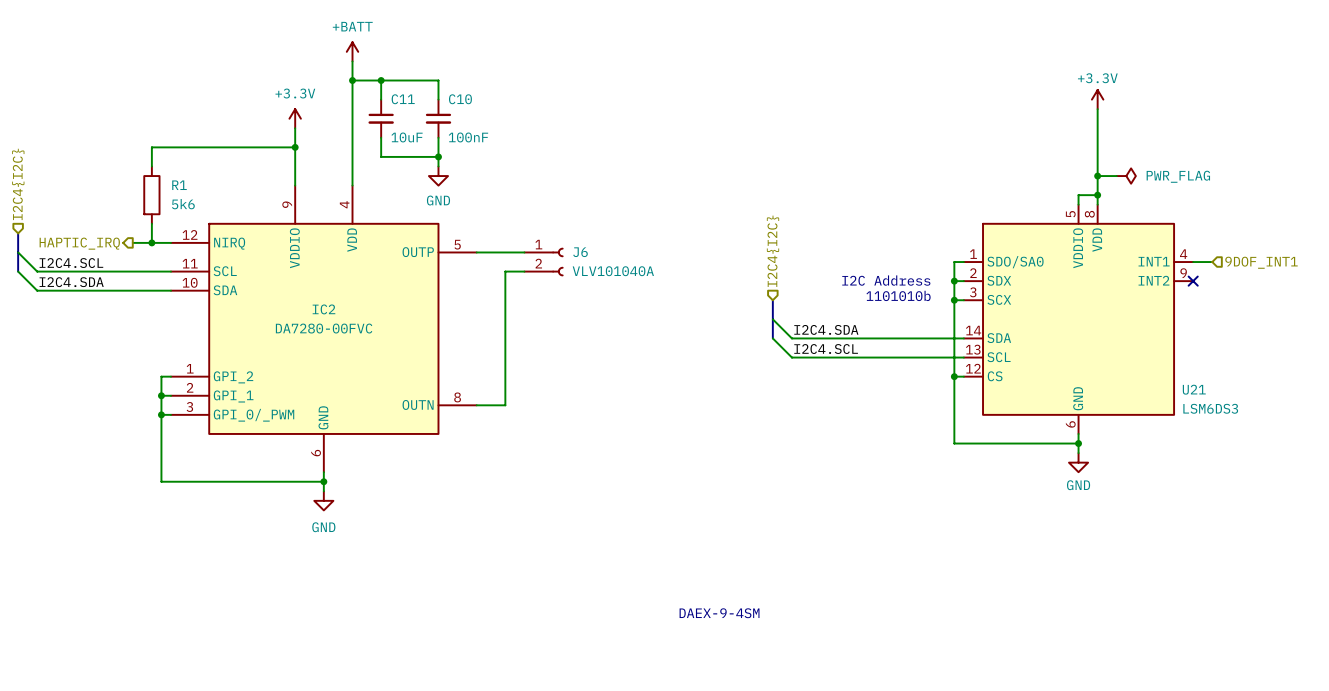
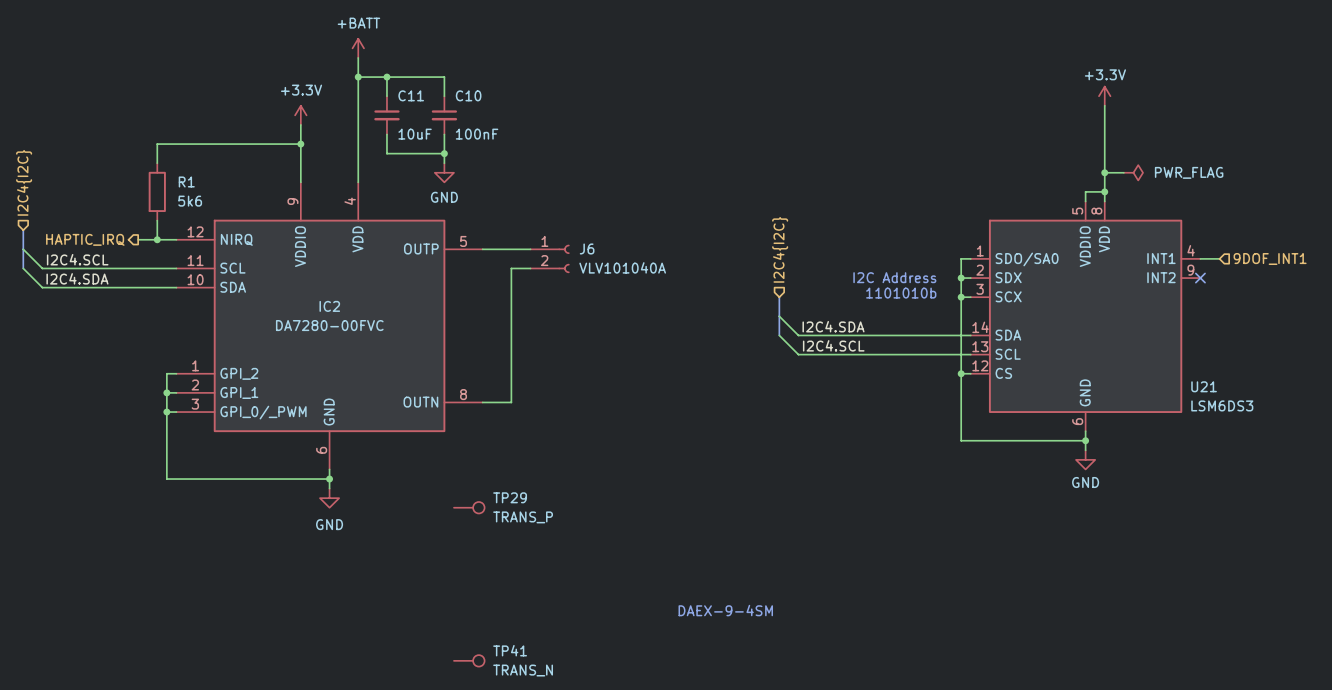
TP29: none -> TRANS_P (469, 507)
TP41: none -> TRANS_N (469, 660)

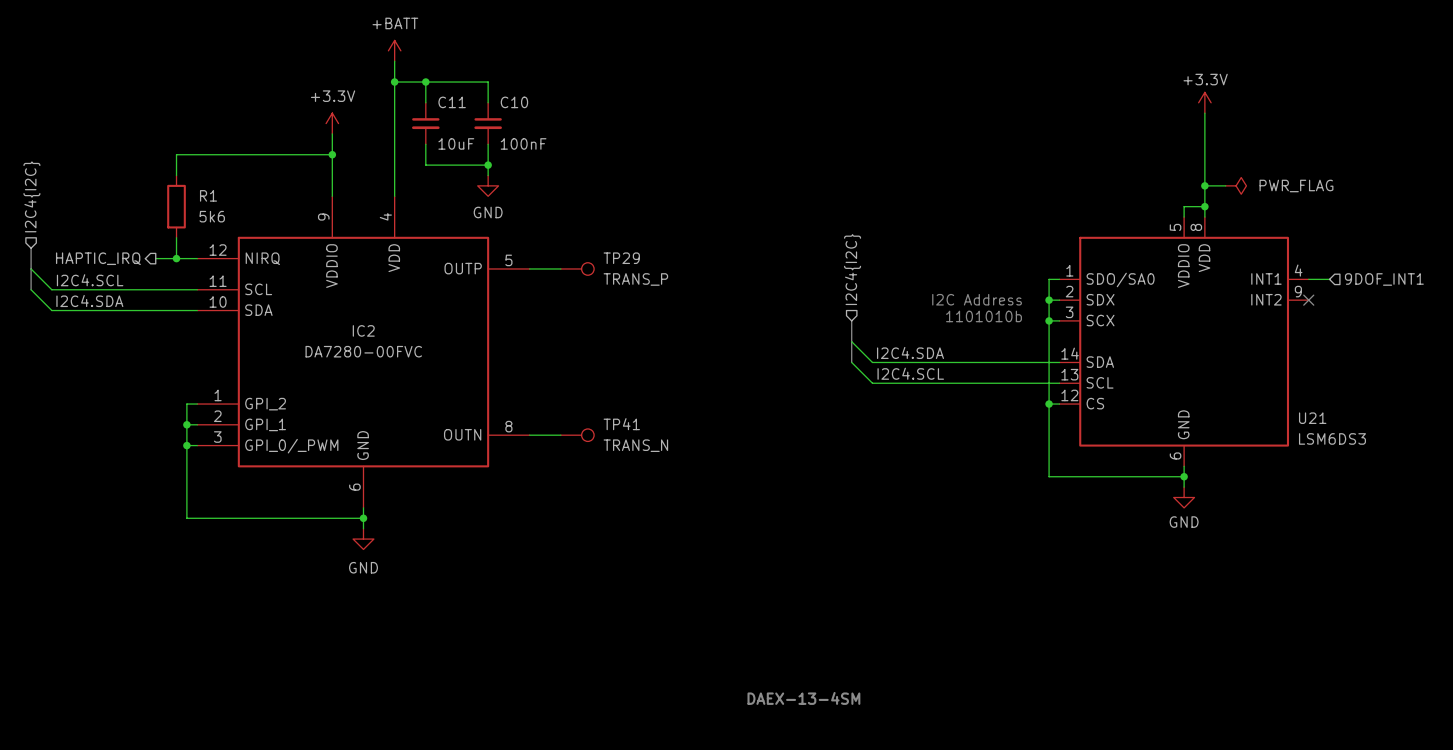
J6: VLV101040A (549, 258) -> none
wire: (530, 268) (511, 268) (511, 402) -> none
TP29 position: (469, 507) -> (577, 268)
text: DAEX-9-4SM (725, 610) -> none
text: none -> DAEX-13-4SM (803, 698)
TP41 position: (469, 660) -> (577, 435)

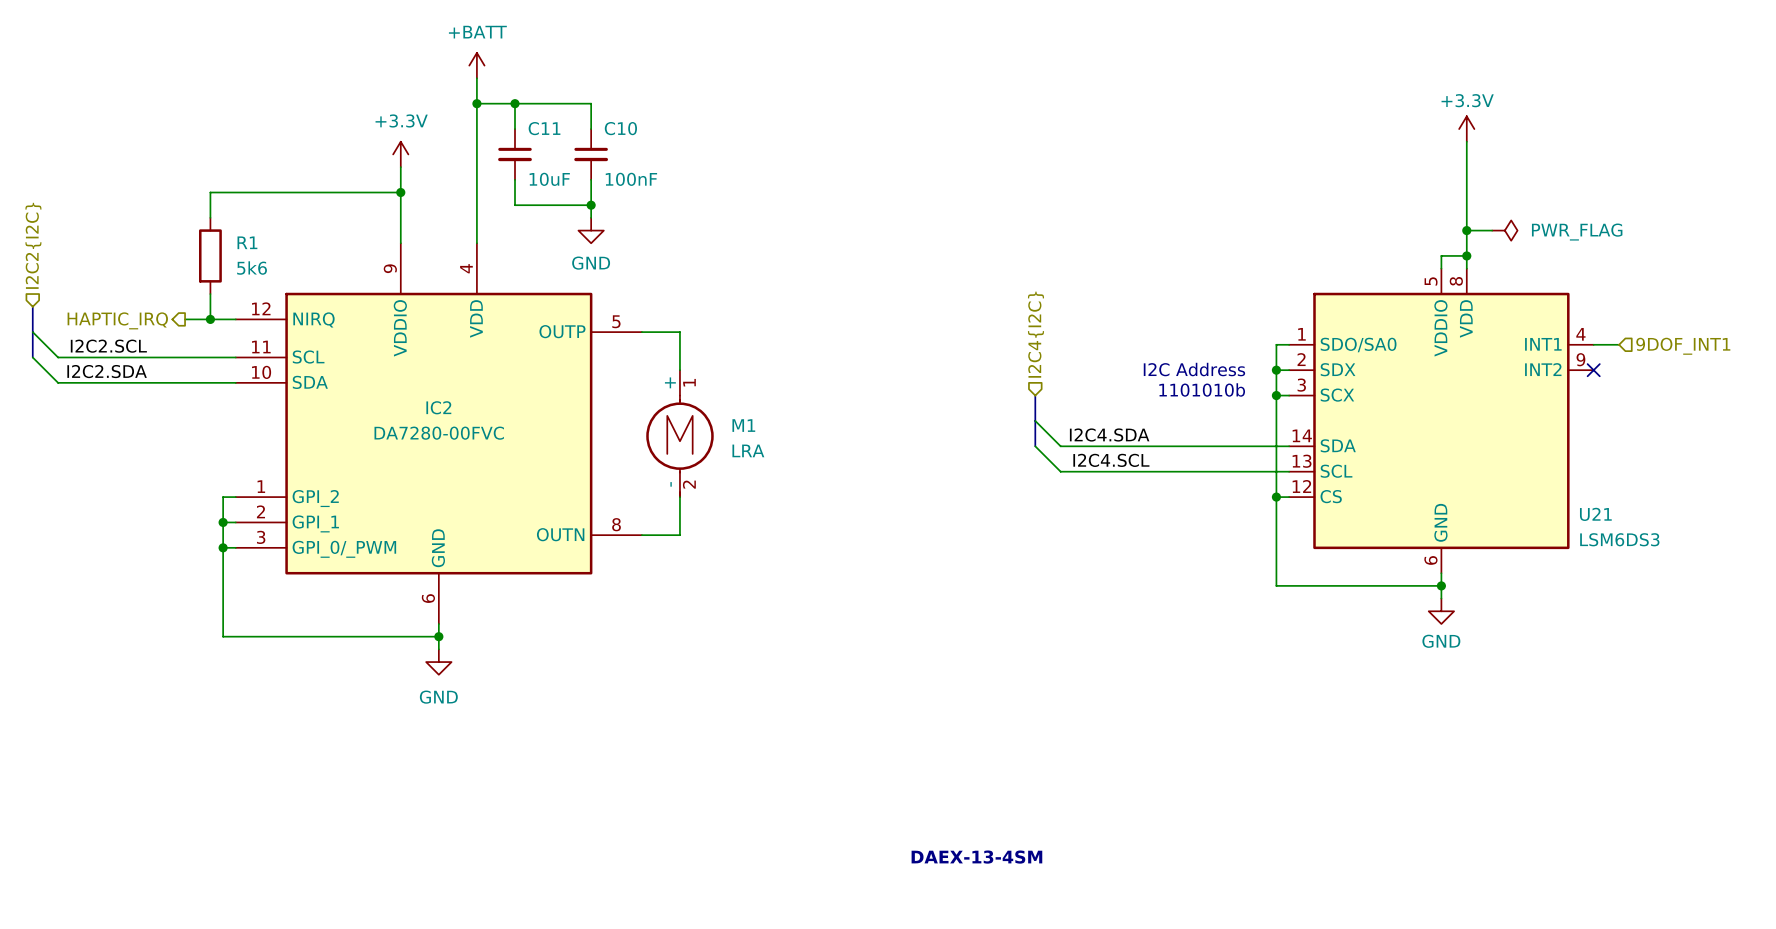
hierarchical label: I2C4{I2C} (31, 196) -> I2C2{I2C} (33, 245)
wire: none -> (679, 332) (679, 370)
TP29: TRANS_P (577, 268) -> none
label: I2C4.SCL (90, 280) -> I2C2.SCL (108, 346)
label: I2C4.SDA (89, 301) -> I2C2.SDA (107, 371)
M1: none -> LRA (679, 433)
wire: none -> (679, 497) (679, 535)
TP41: TRANS_N (577, 435) -> none

